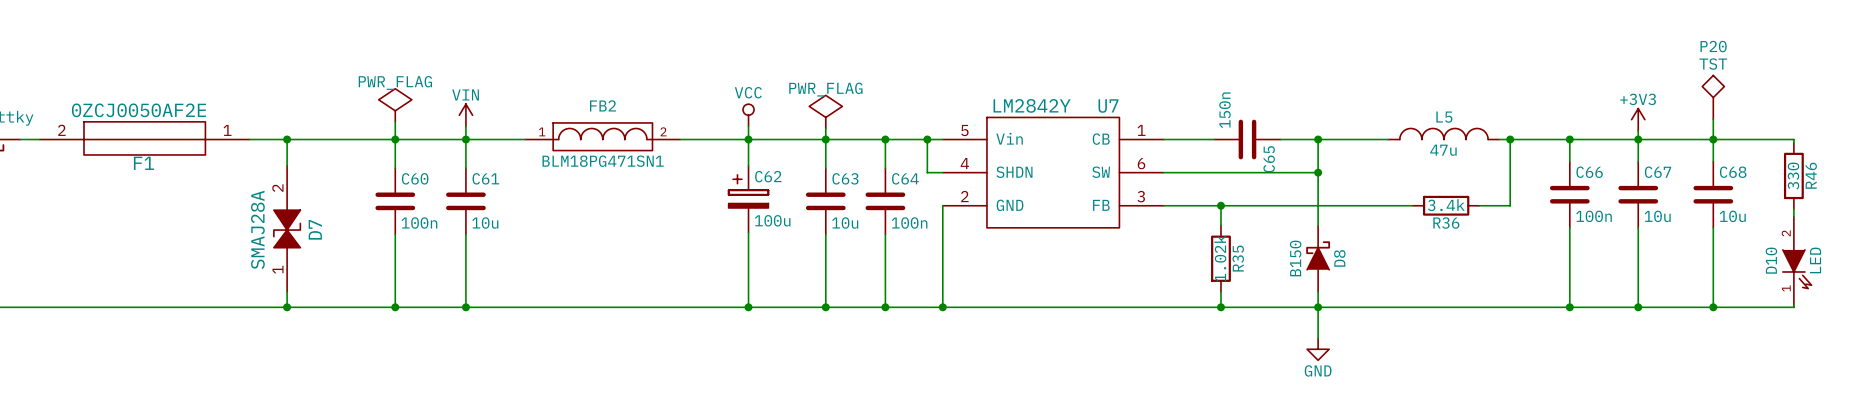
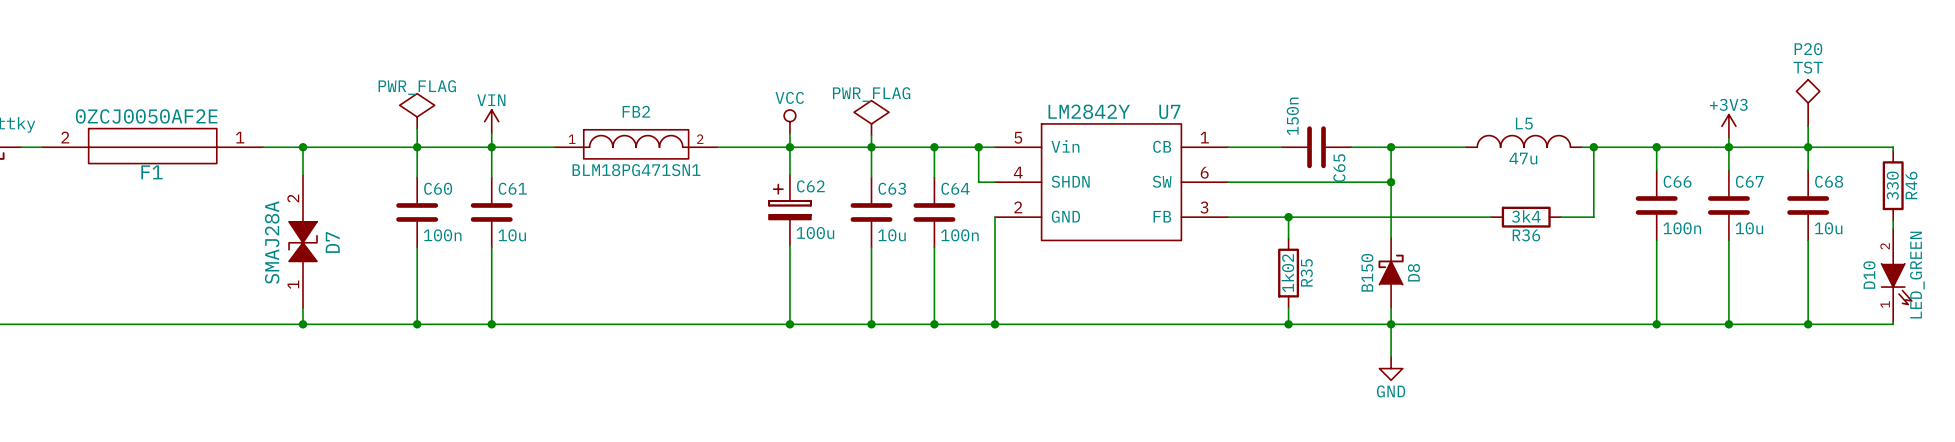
R36 value: 3.4k (1446, 205) -> 3k4 (1526, 216)
R35 value: 1.02k (1220, 258) -> 1k02 (1287, 273)
D10 value: LED (1815, 260) -> LED_GREEN (1917, 275)

